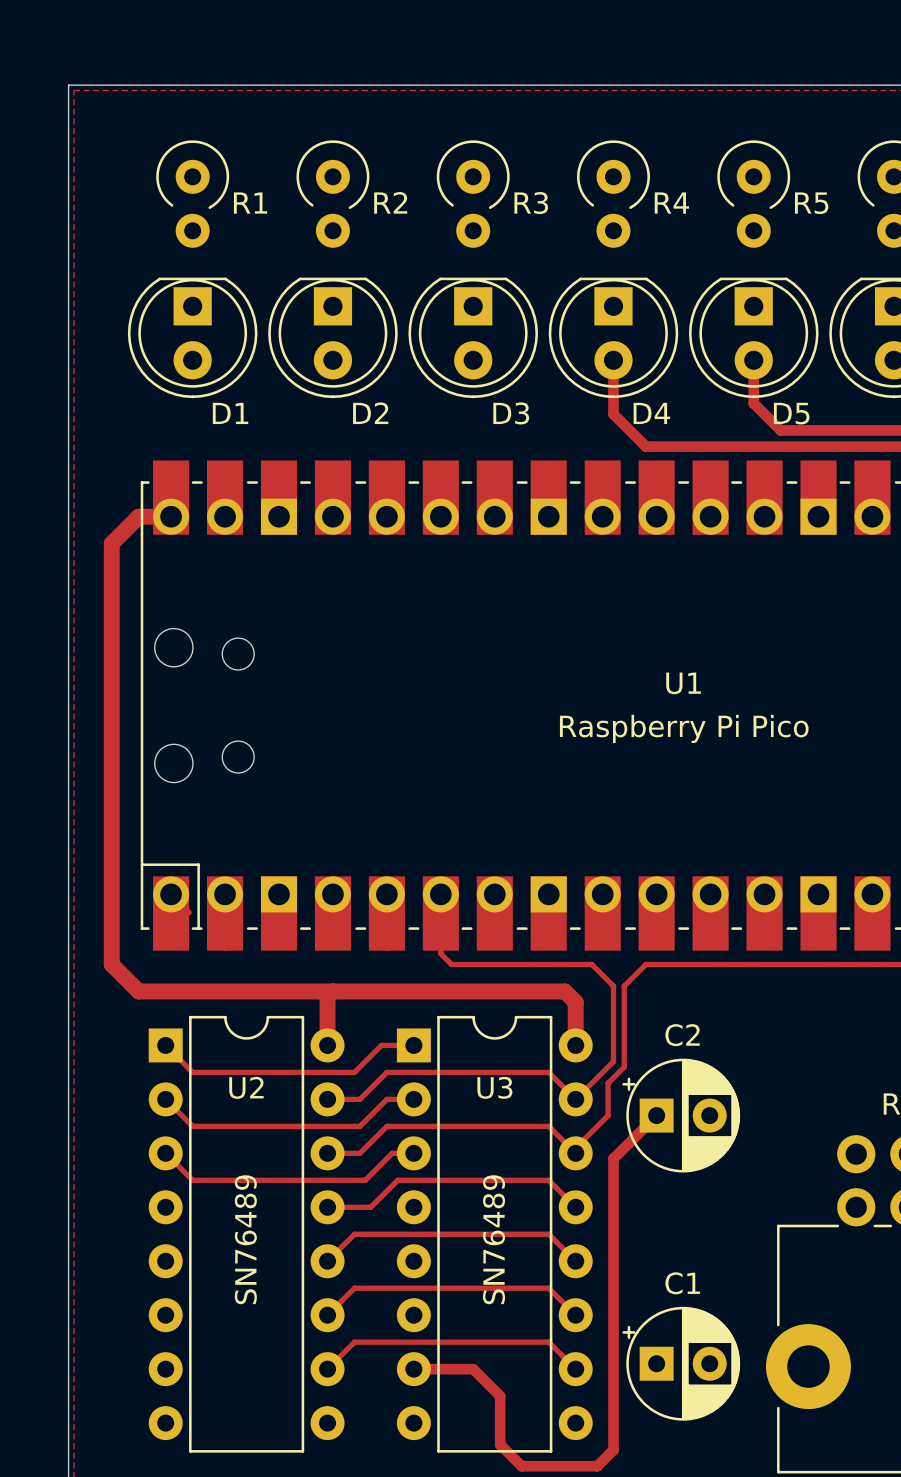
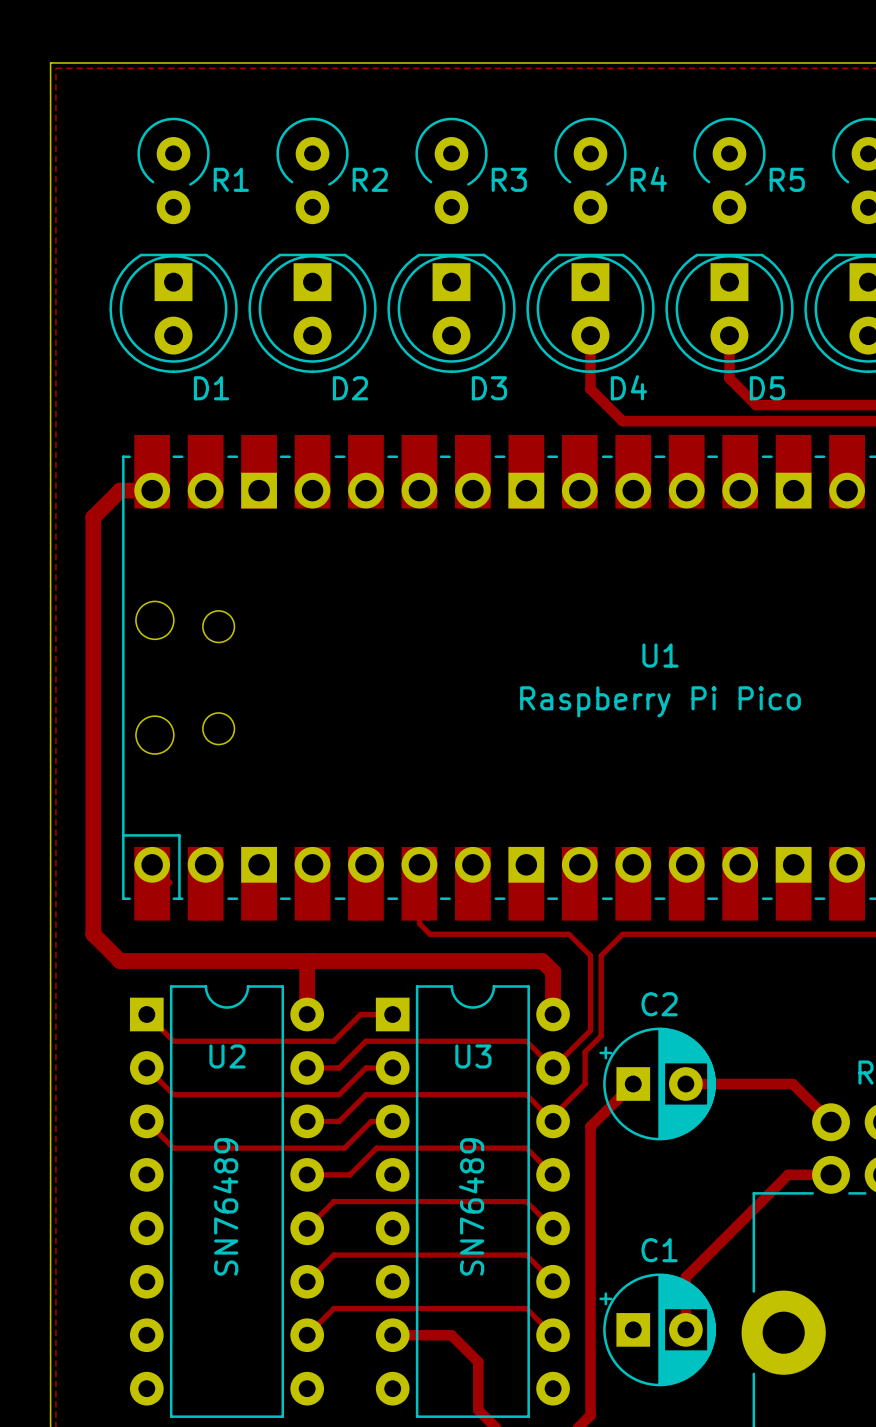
track: none -> (685, 1083) (792, 1083) (831, 1122)
track: none -> (831, 1174) (788, 1174) (685, 1277) (685, 1329)

